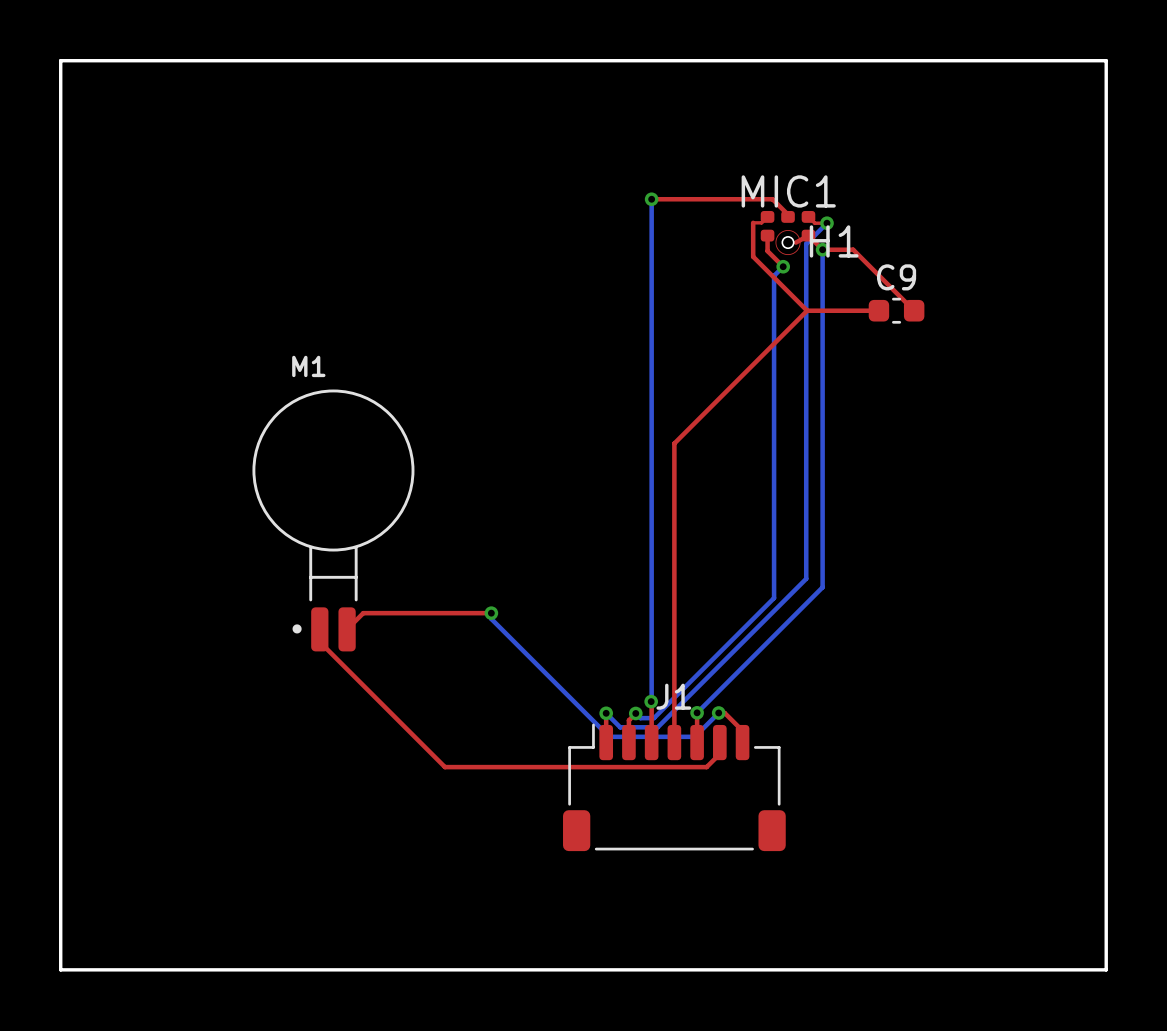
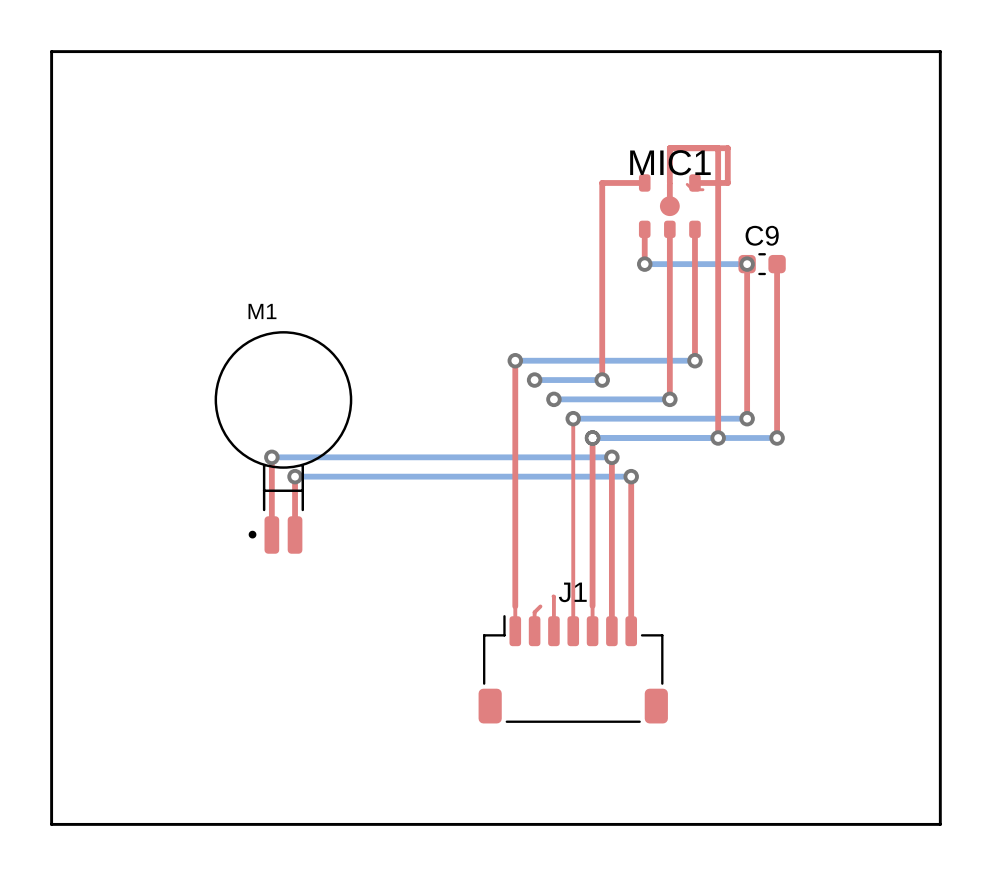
top track: none -> (718, 148) (718, 438)
top track: (651, 199) (772, 199) (788, 214) -> (694, 182) (727, 182) (727, 148) (669, 148) (669, 182)
bottom track: (651, 199) (651, 701) -> none
via: (651, 199) -> none
MIC1 footprint: [760, 210, 816, 256] -> [638, 174, 701, 239]
top track: none -> (644, 182) (602, 182) (602, 380)
top track: (767, 216) (761, 222) (753, 222) (753, 256) (807, 310) -> none
top track: none -> (669, 184) (669, 206)
bottom track: (827, 223) (806, 243) (806, 578) (657, 727) (620, 727) (606, 713) -> none
via: (827, 223) -> none
top track: (767, 235) (767, 251) (783, 266) -> none
H1: (788, 242) -> none
top track: (795, 242) (808, 235) (822, 249) (853, 249) (914, 310) -> (777, 438) (777, 264)
bottom track: (822, 249) (822, 587) (697, 712) -> none
via: (822, 249) -> none
bottom track: (783, 266) (774, 275) (774, 598) (654, 718) (640, 718) (635, 713) -> none
via: (783, 266) -> none
top track: none -> (644, 229) (644, 264)
top track: none -> (669, 229) (669, 399)
top track: none -> (694, 229) (694, 360)
bottom track: none -> (644, 264) (747, 264)
via: none -> (644, 264)
top track: (807, 310) (878, 310) -> (747, 418) (747, 264)
top track: (807, 310) (674, 443) (674, 492) -> none
via: none -> (747, 264)
top track: none -> (515, 360) (515, 606)
bottom track: none -> (515, 360) (694, 360)
via: none -> (515, 360)
via: none -> (694, 360)
bottom track: none -> (534, 380) (602, 380)
via: none -> (534, 380)
via: none -> (602, 380)
bottom track: none -> (553, 399) (669, 399)
via: none -> (553, 399)
via: none -> (669, 399)
bottom track: none -> (573, 418) (747, 418)
via: none -> (573, 418)
via: none -> (747, 418)
top track: none -> (592, 438) (592, 605)
bottom track: none -> (592, 438) (777, 438)
via: none -> (592, 438)
via: none -> (718, 438)
via: none -> (777, 438)
top track: none -> (271, 457) (271, 534)
bottom track: none -> (271, 457) (611, 457)
via: none -> (271, 457)
via: none -> (611, 457)
bottom track: none -> (295, 476) (631, 476)
via: none -> (295, 476)
via: none -> (631, 476)
top track: (491, 613) (363, 613) (347, 629) -> (295, 476) (295, 534)
bottom track: (491, 613) (491, 618) (609, 736) (694, 736) (718, 712) -> none
via: (491, 613) -> none
top track: (319, 629) (319, 641) (444, 767) (706, 767) (719, 753) (719, 742) -> (611, 457) (611, 631)
via: (651, 701) -> none
via: (697, 712) -> none
top track: (718, 712) (724, 712) (742, 730) -> (631, 476) (631, 621)
via: (718, 712) -> none
via: (606, 713) -> none
via: (635, 713) -> none

